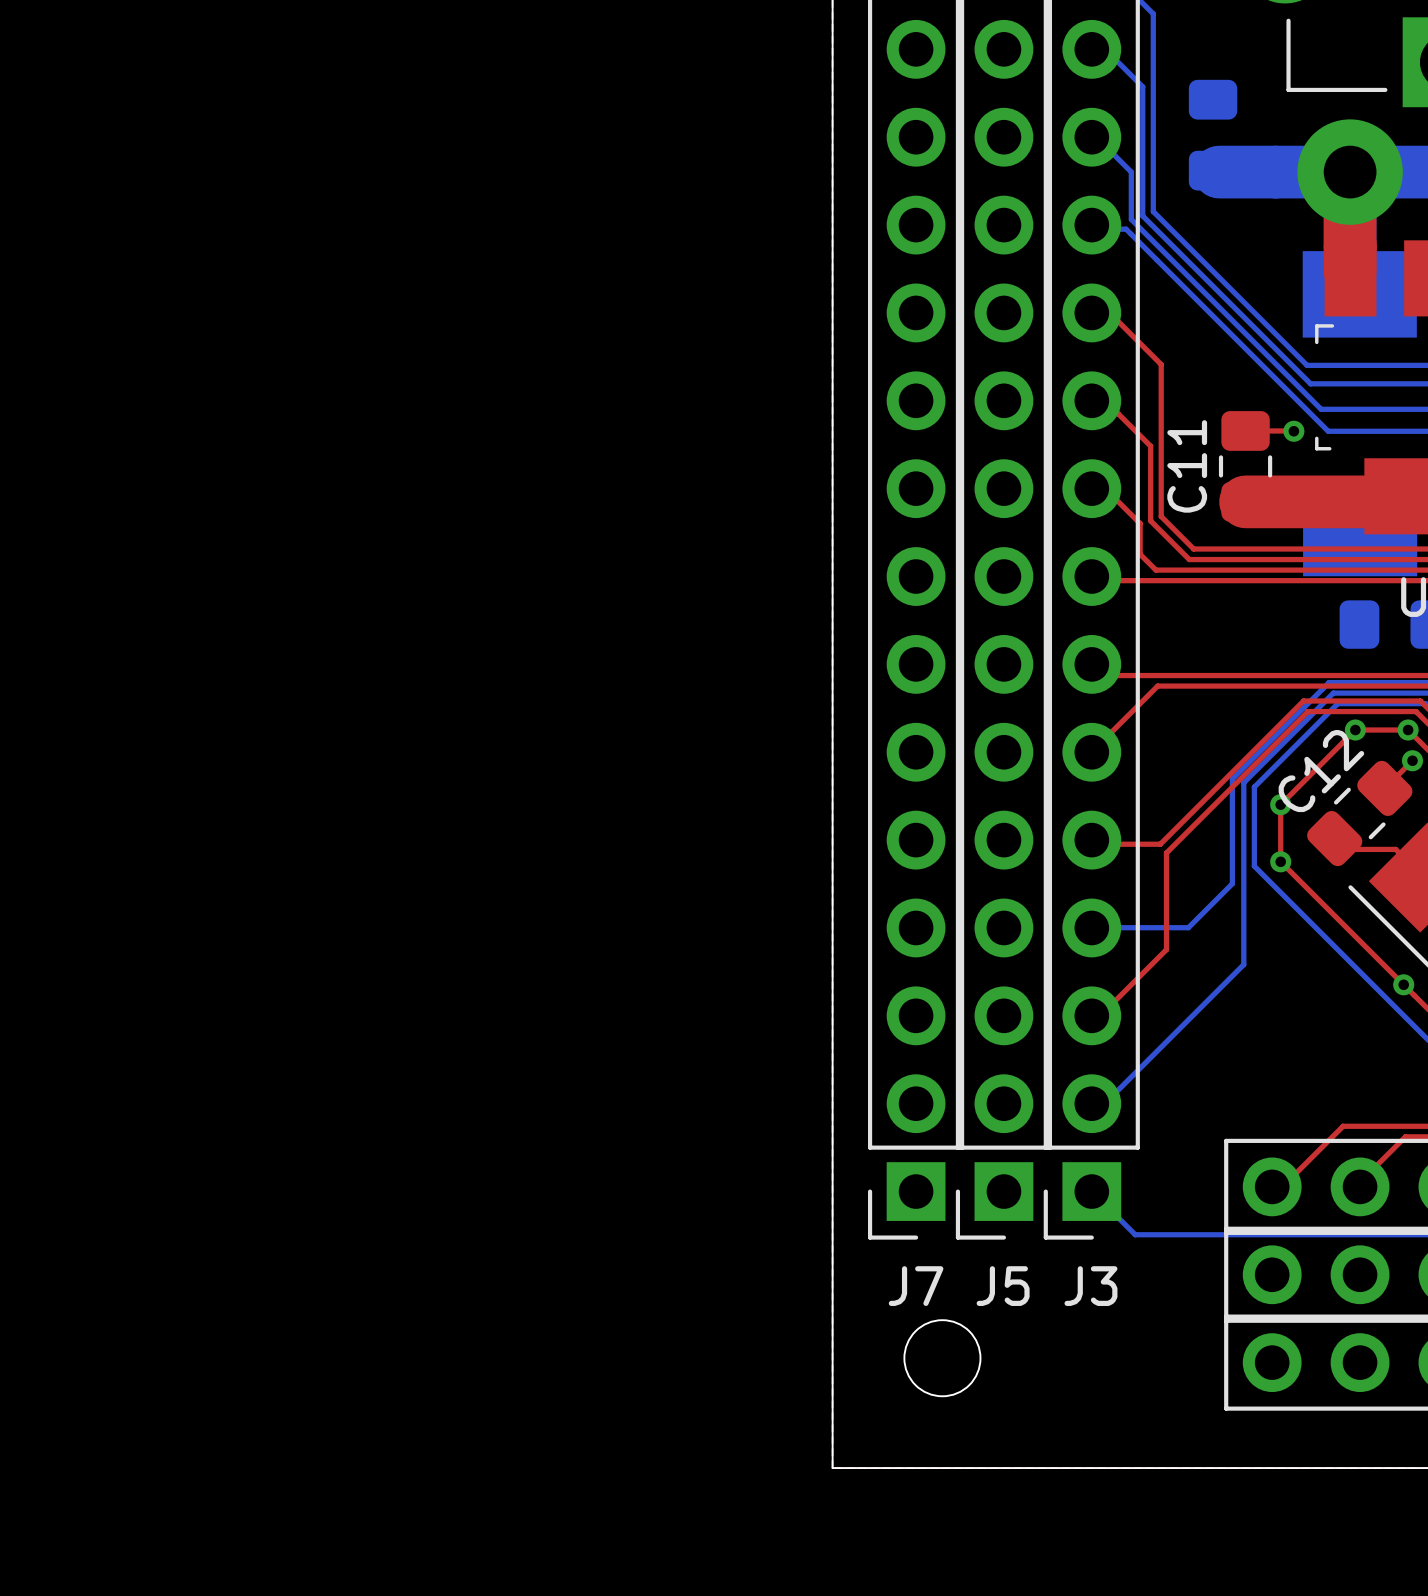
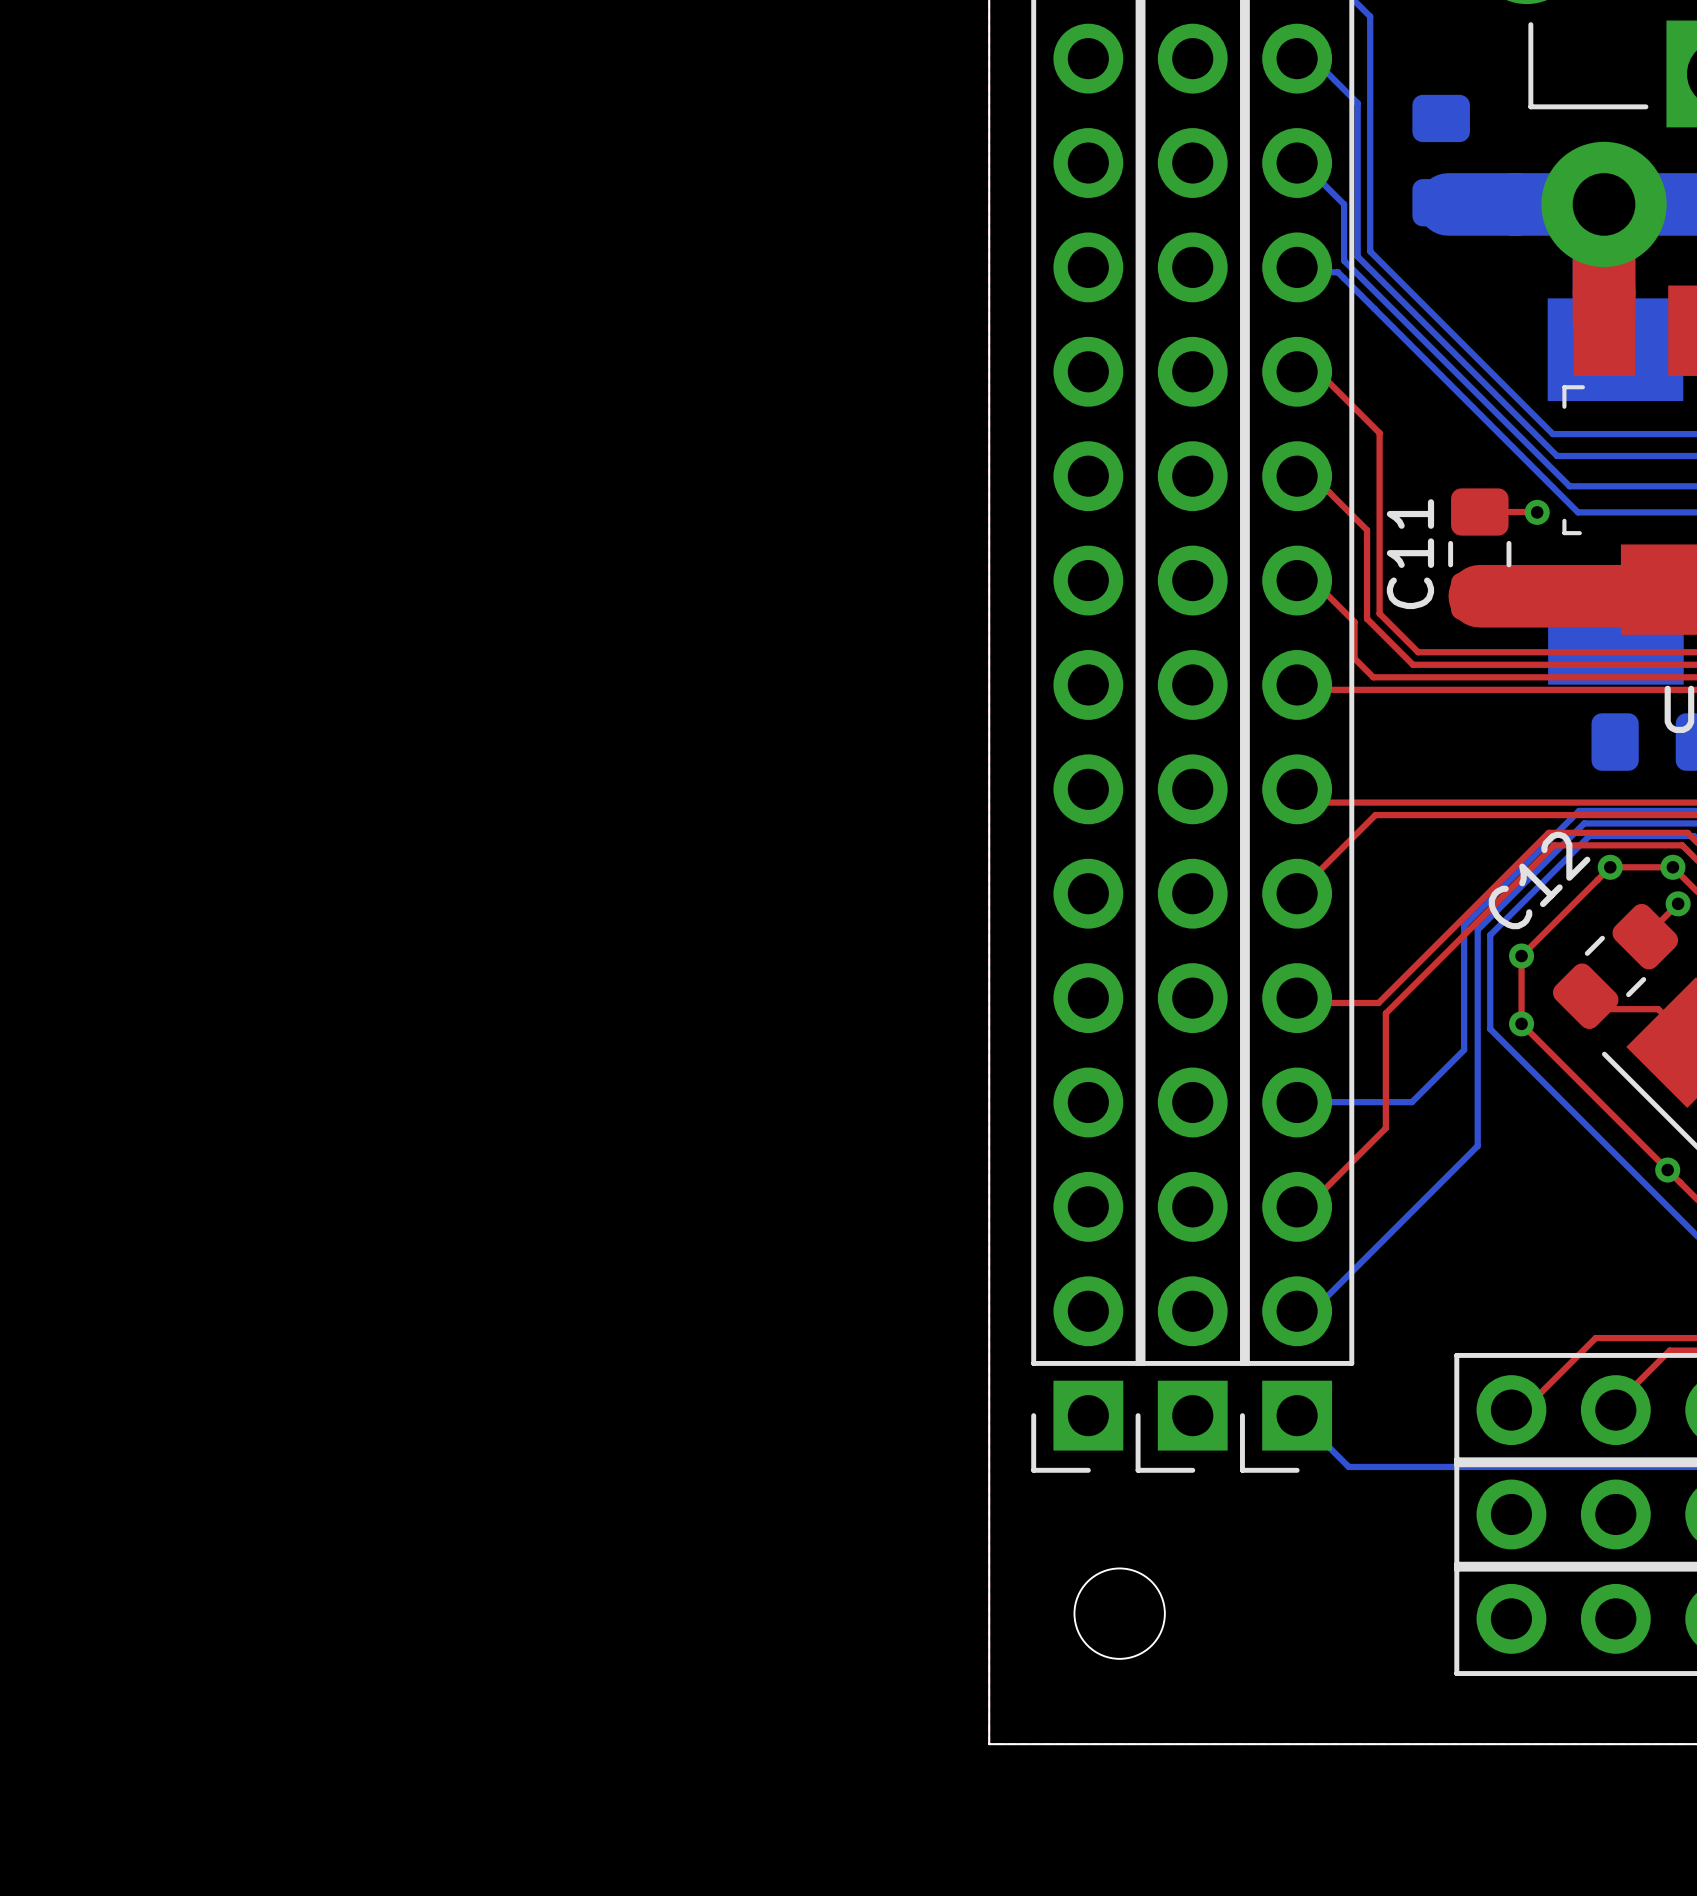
C12 name position: C12 (1321, 771) -> C12 (1539, 880)
J7 name: J7 (916, 1286) -> none
J5 name: J5 (1003, 1286) -> none
J3 name: J3 (1090, 1286) -> none

